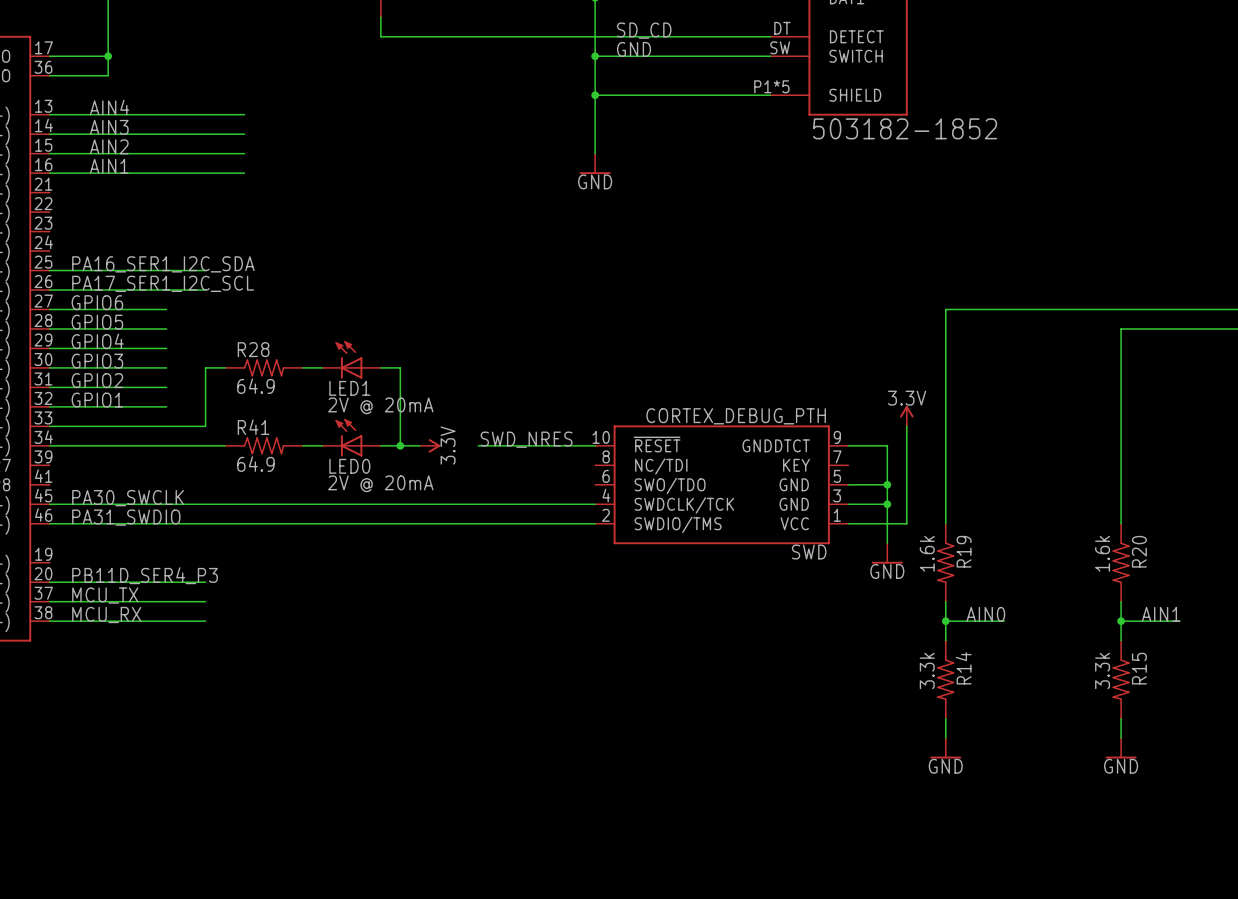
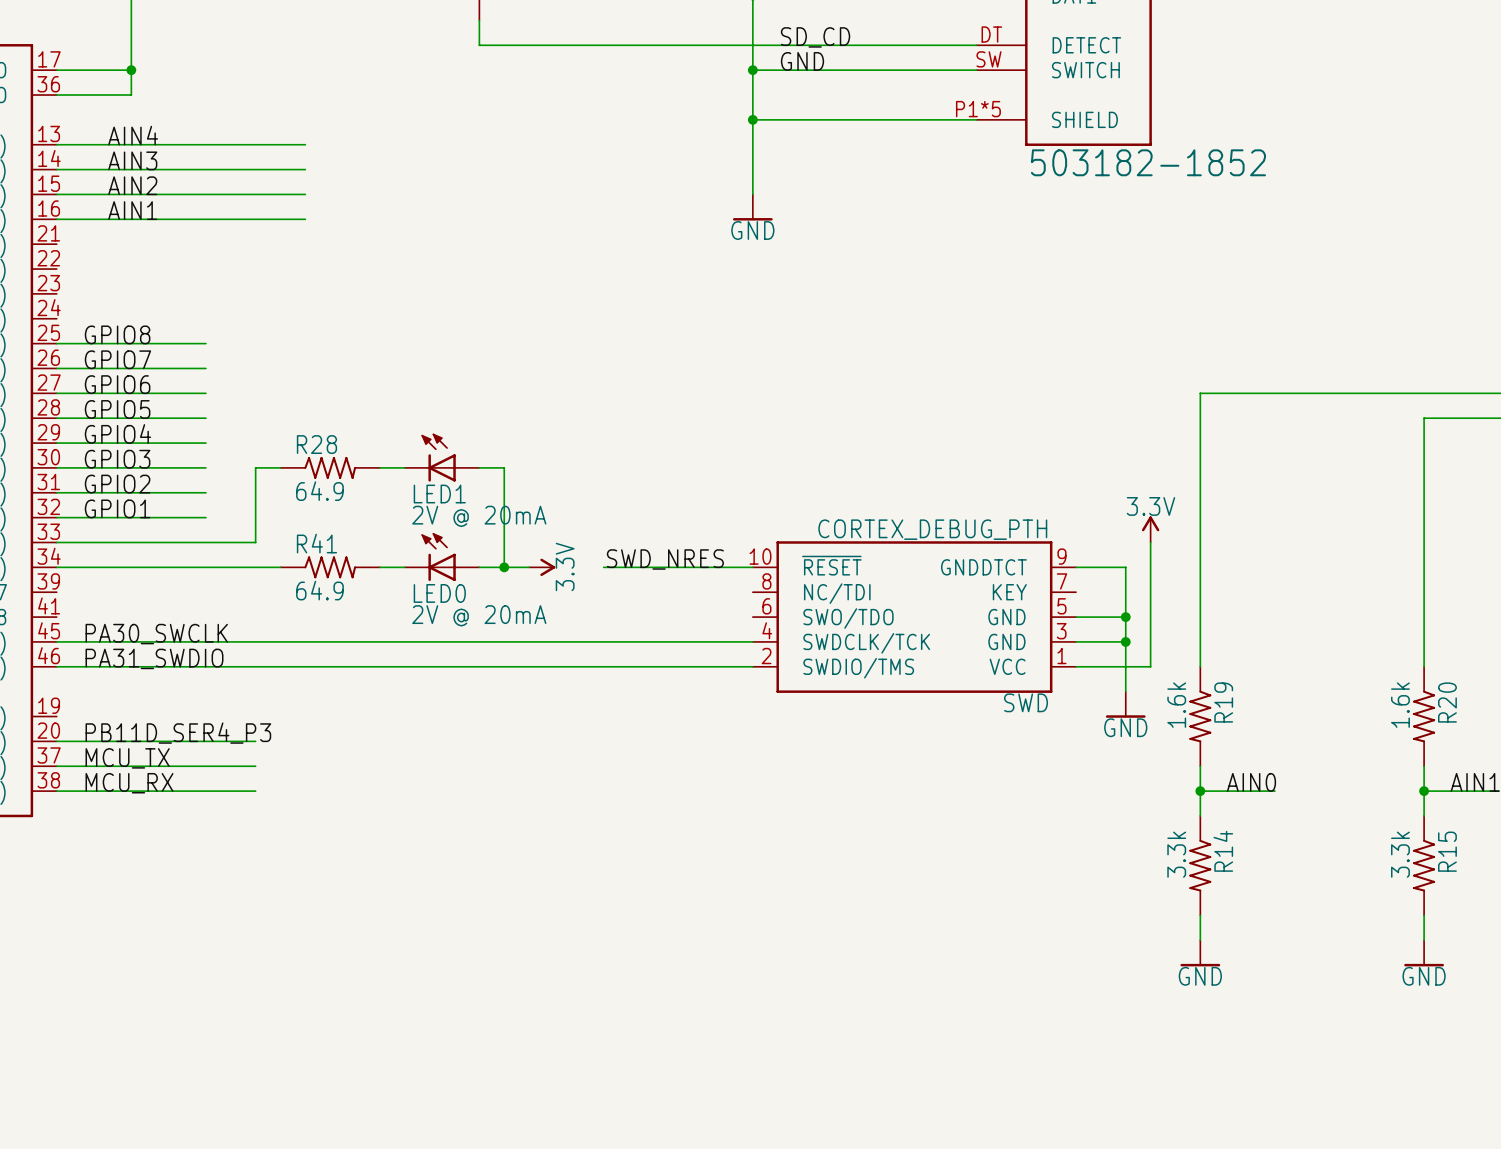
label: PA16_SER1_I2C_SDA (163, 264) -> GPIO8 (117, 334)
wire: (166, 270) (205, 270) -> none
label: PA17_SER1_I2C_SCL (163, 283) -> GPIO7 (117, 359)
wire: (166, 290) (205, 290) -> none

